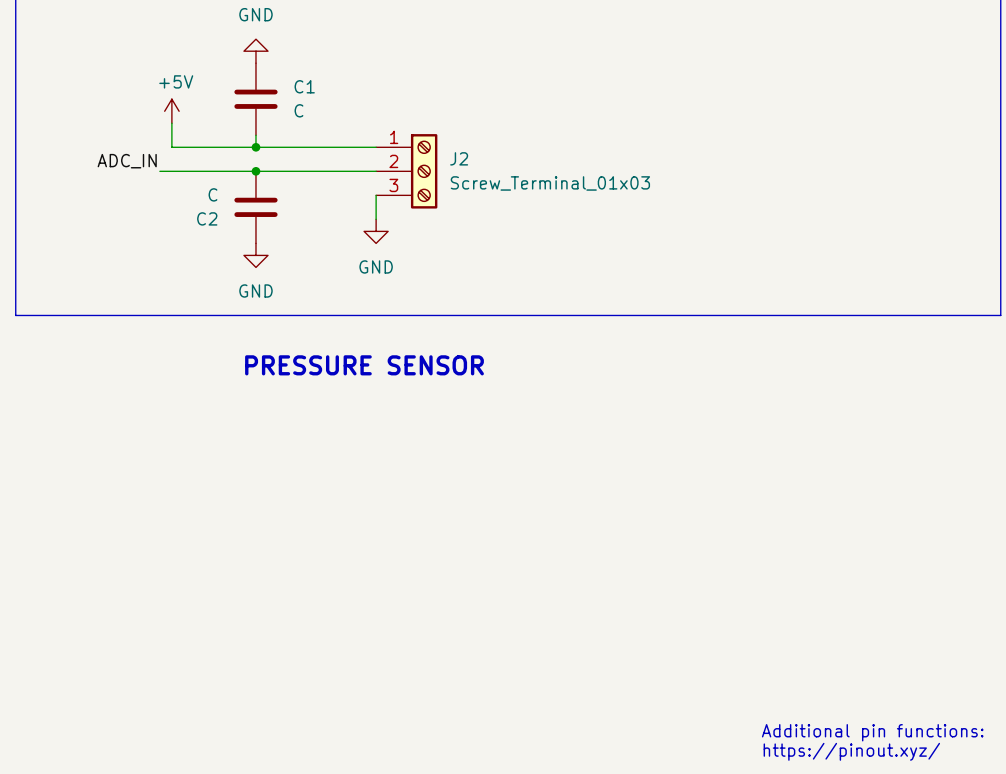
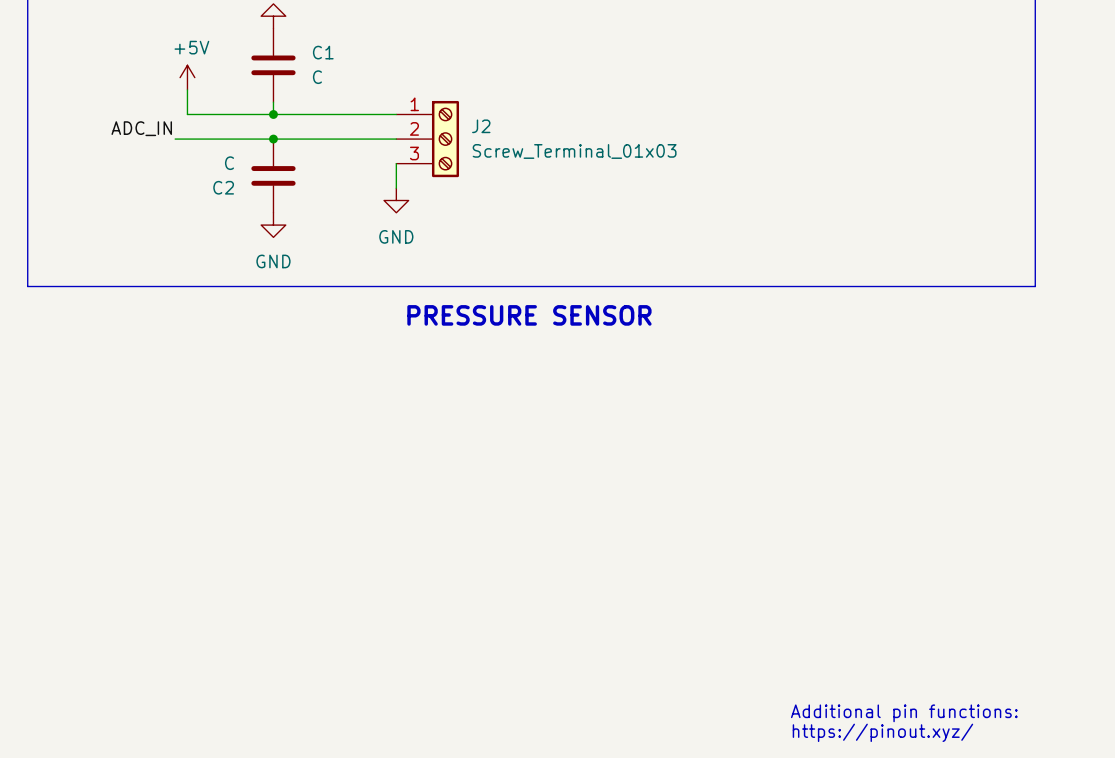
text position: PRESSURE SENSOR (364, 365) -> PRESSURE SENSOR (529, 315)

